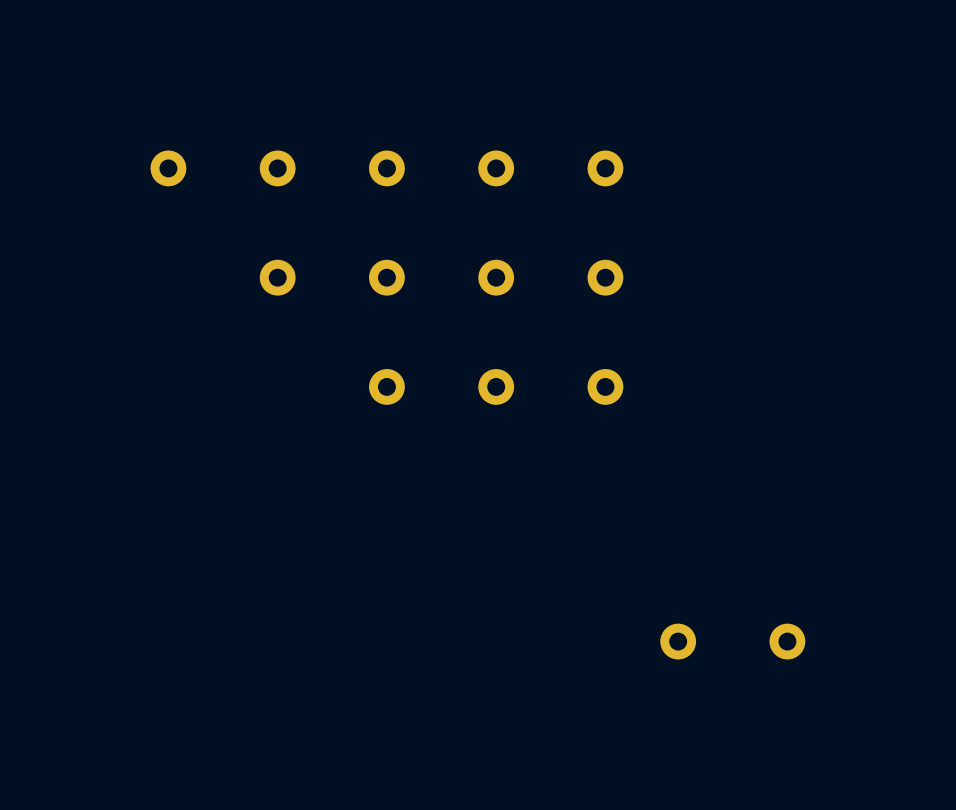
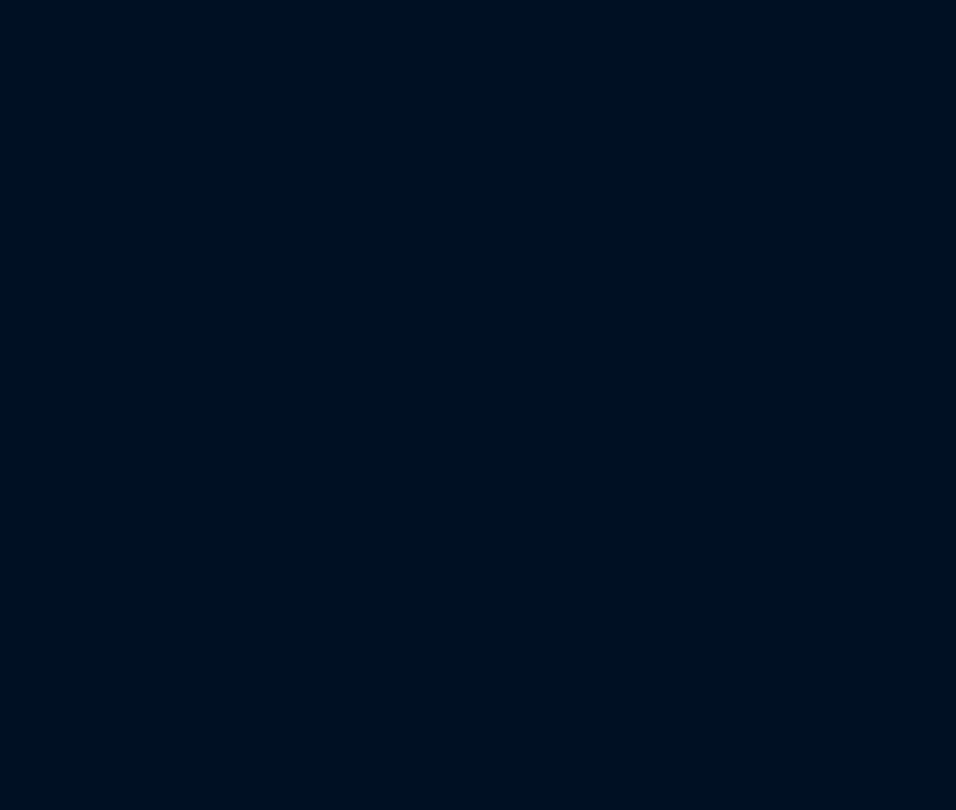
part: (168, 168) -> none
part: (277, 168) -> none
part: (386, 168) -> none
part: (496, 168) -> none
part: (605, 168) -> none
part: (277, 277) -> none
part: (386, 277) -> none
part: (496, 277) -> none
part: (605, 277) -> none
part: (386, 386) -> none
part: (496, 386) -> none
part: (605, 386) -> none
part: (678, 641) -> none
part: (787, 641) -> none

